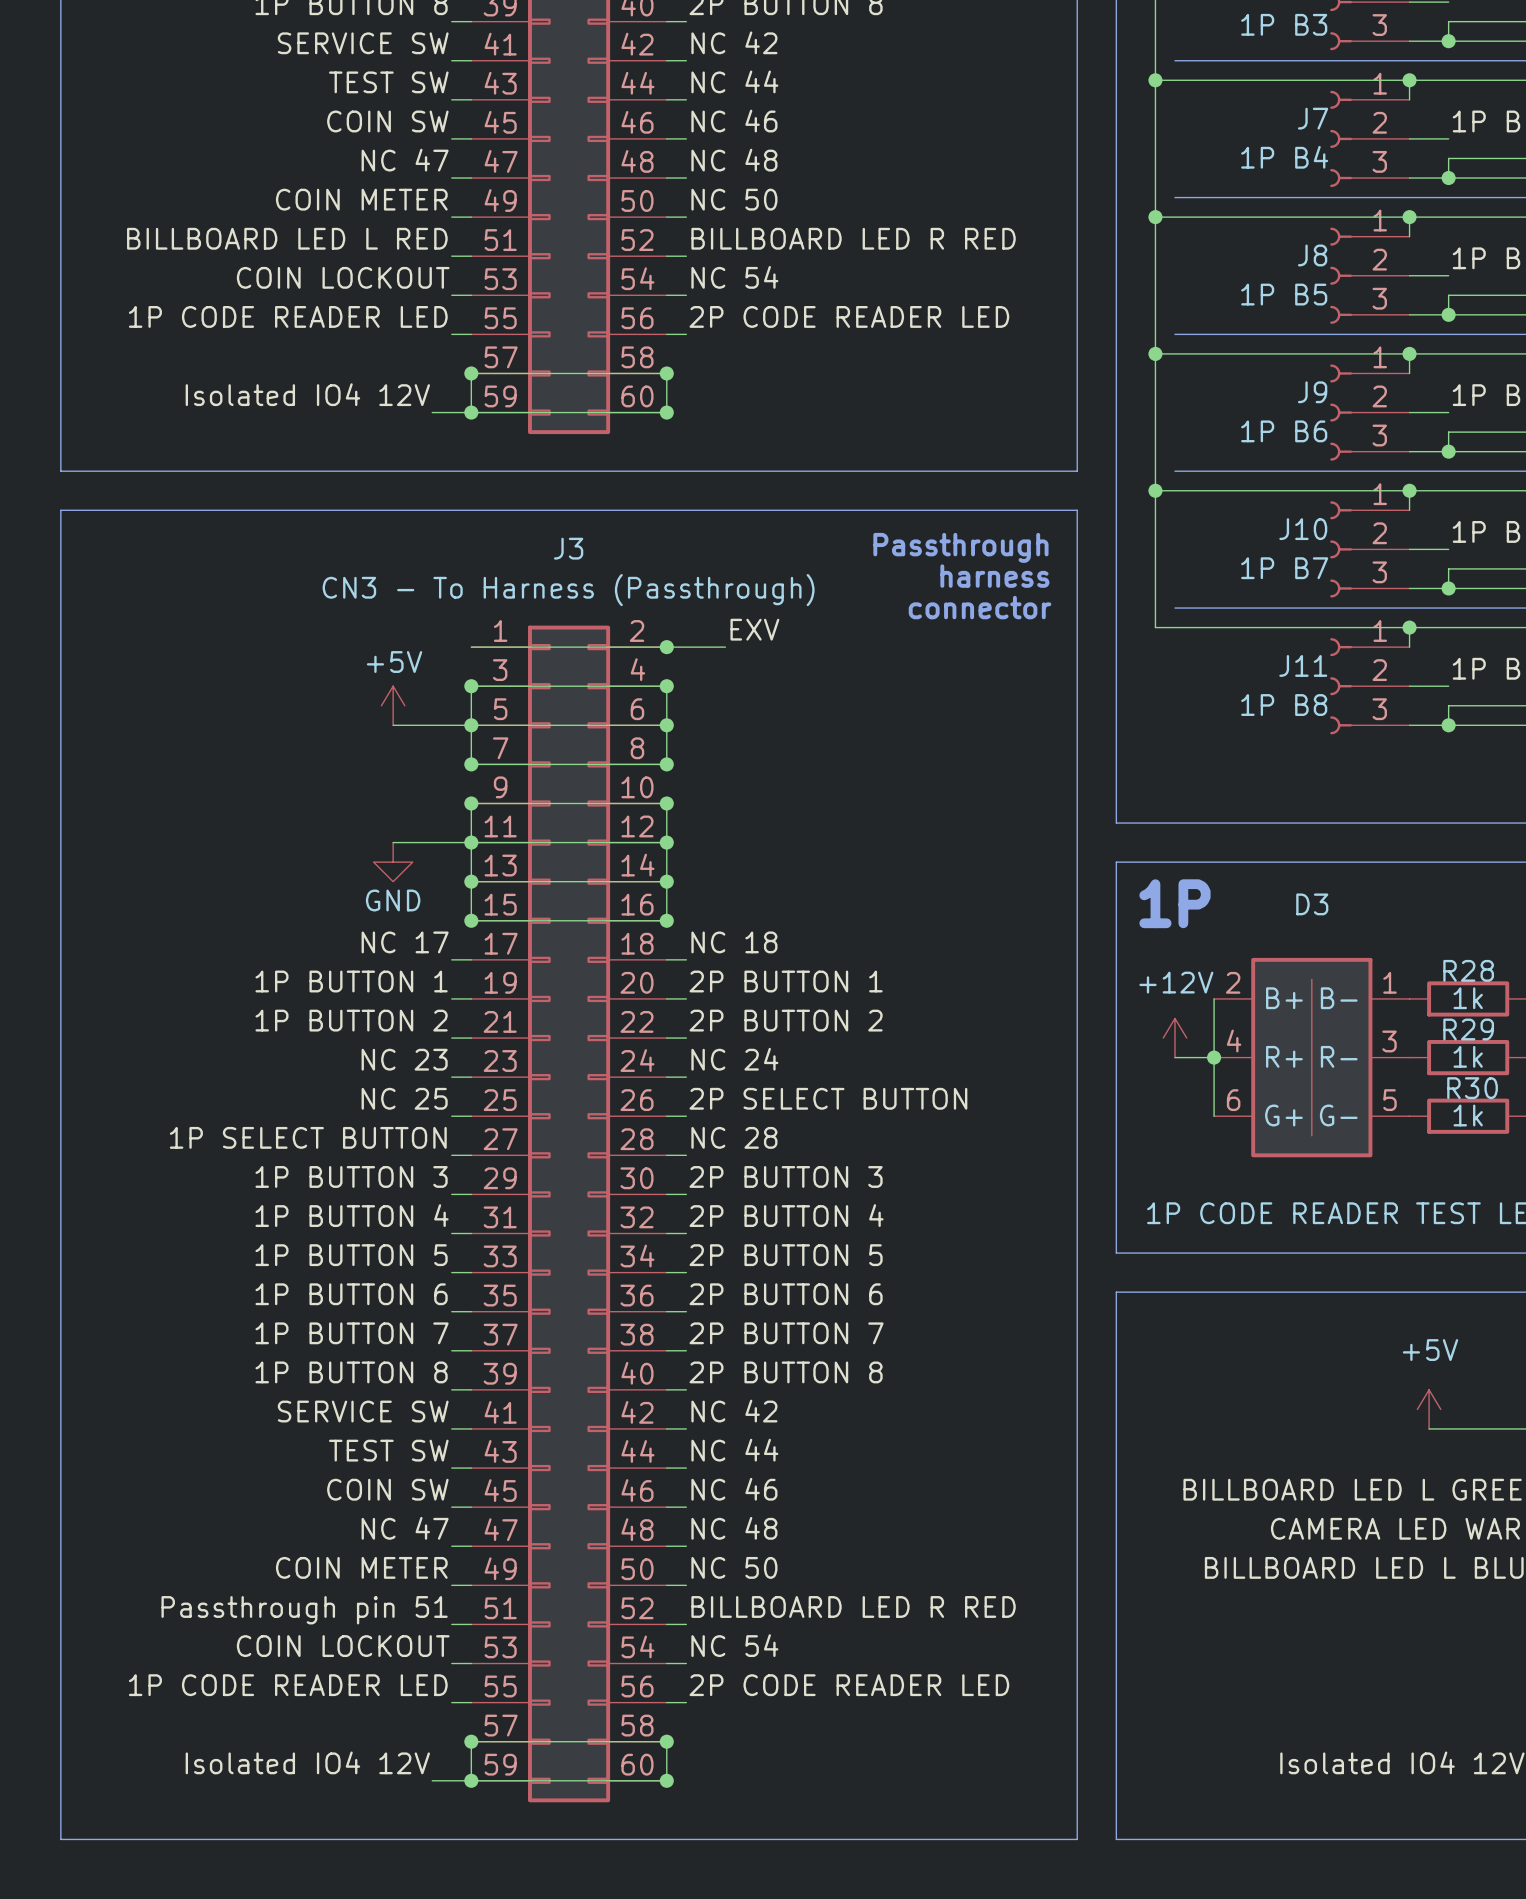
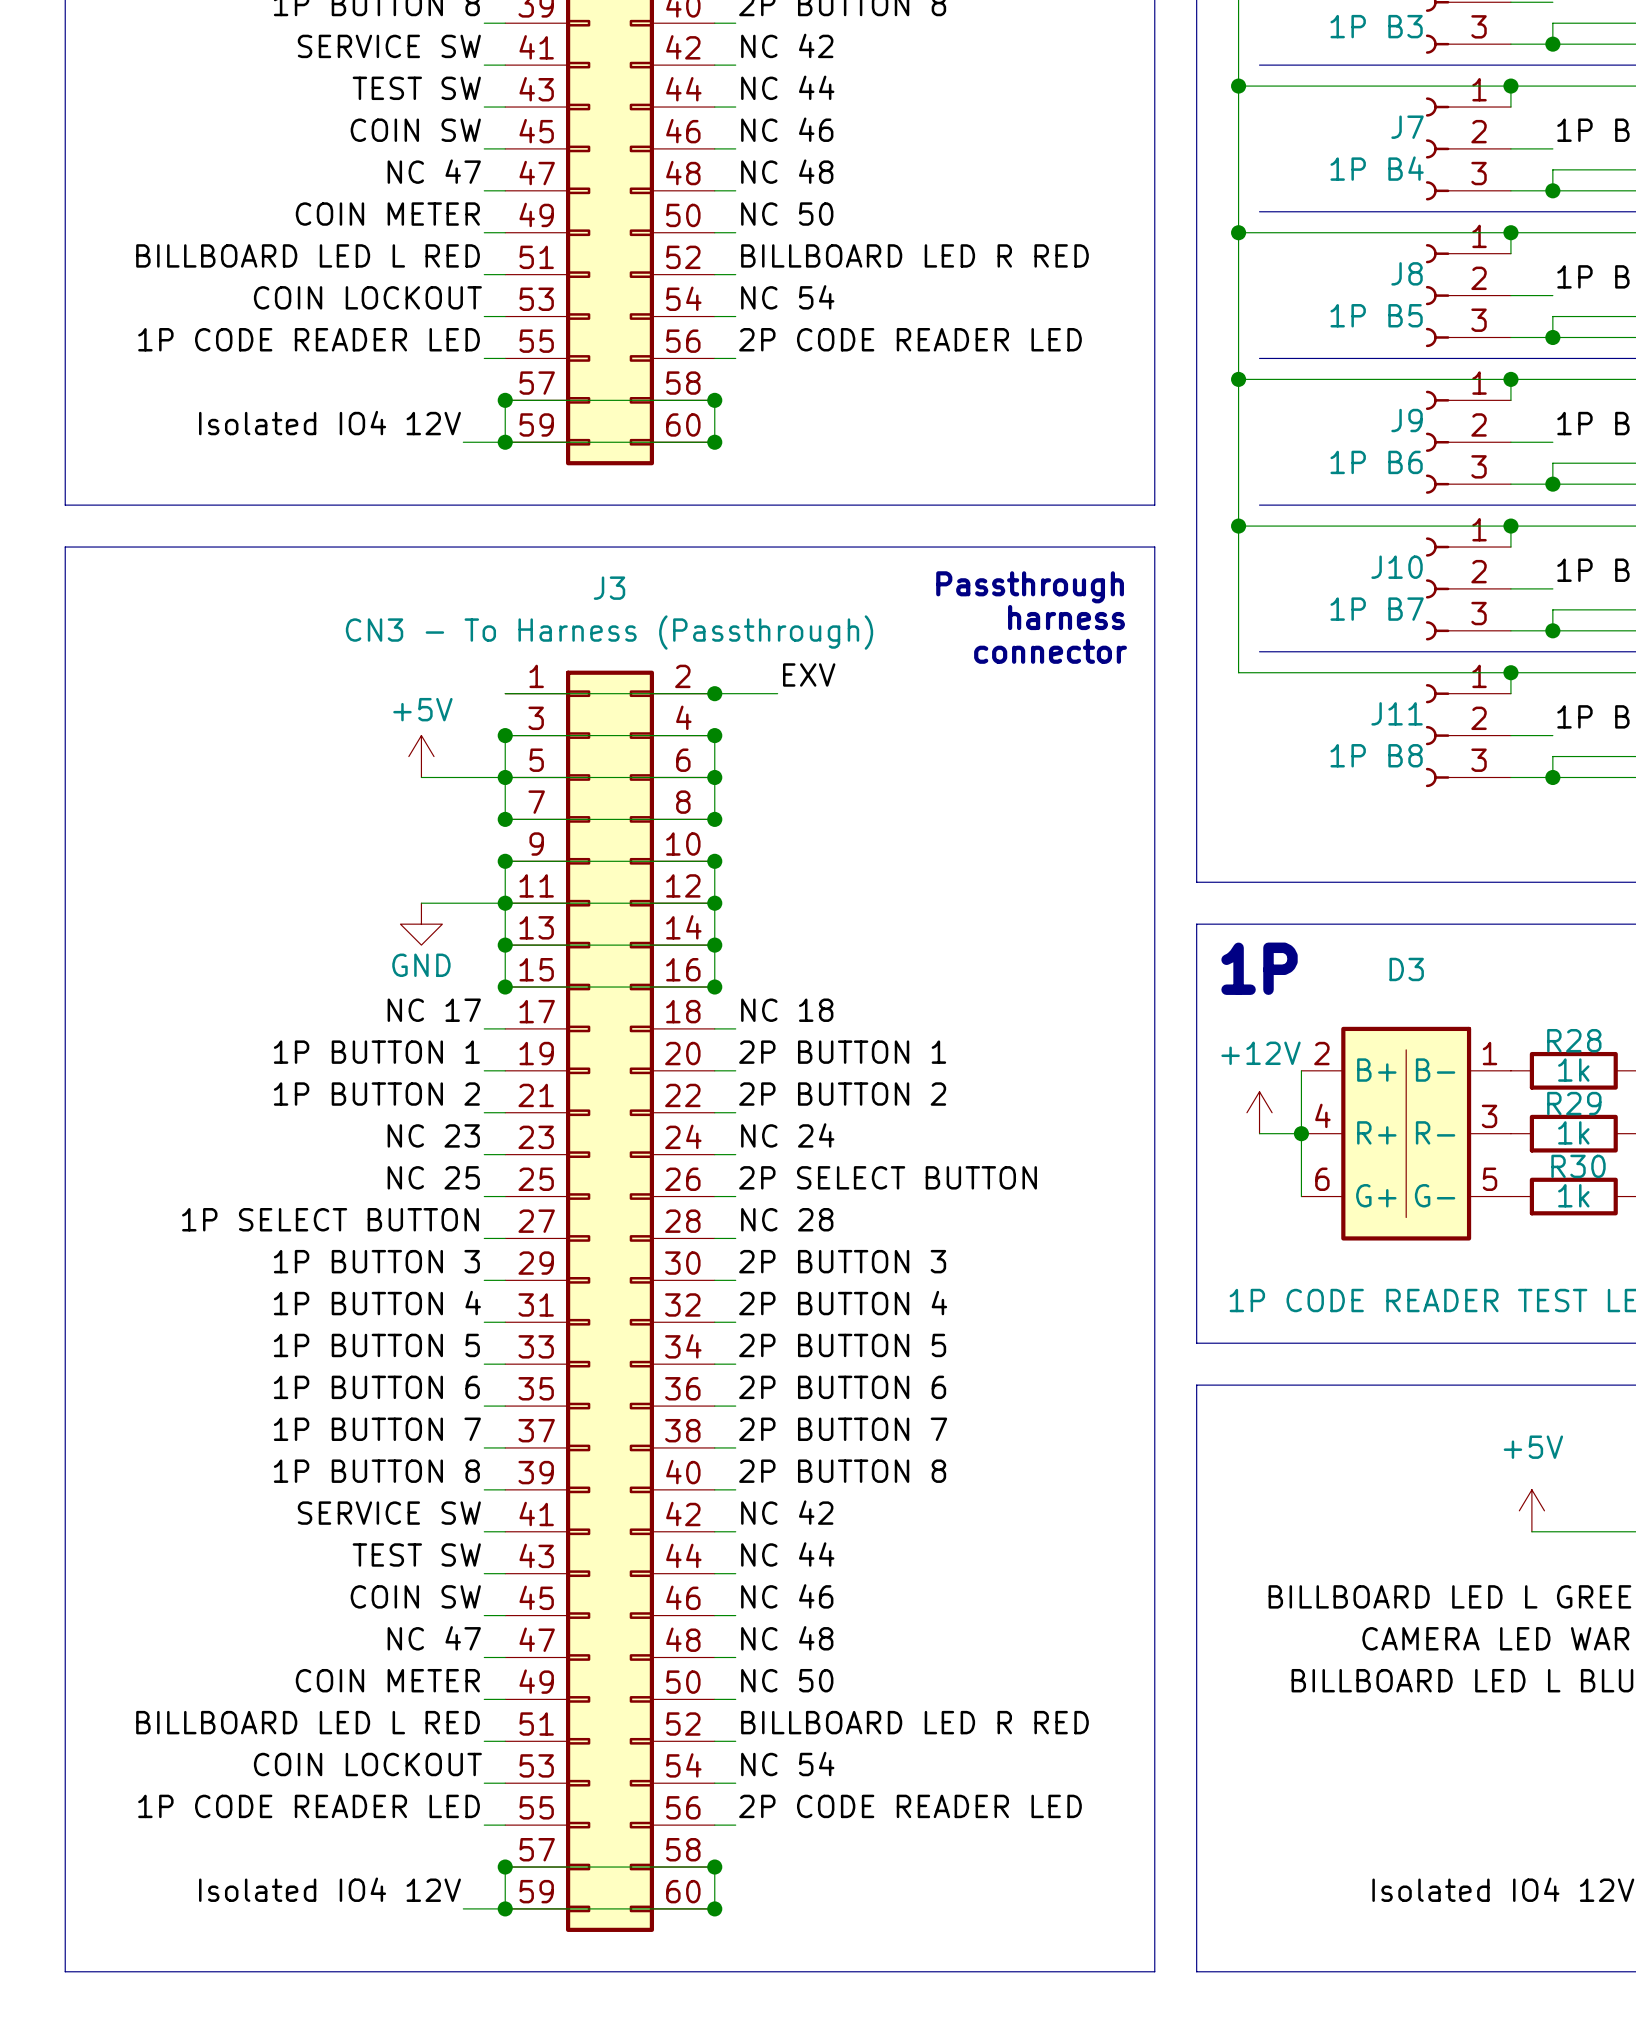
label: Passthrough pin 51 (304, 1610) -> BILLBOARD LED L RED (308, 1722)

